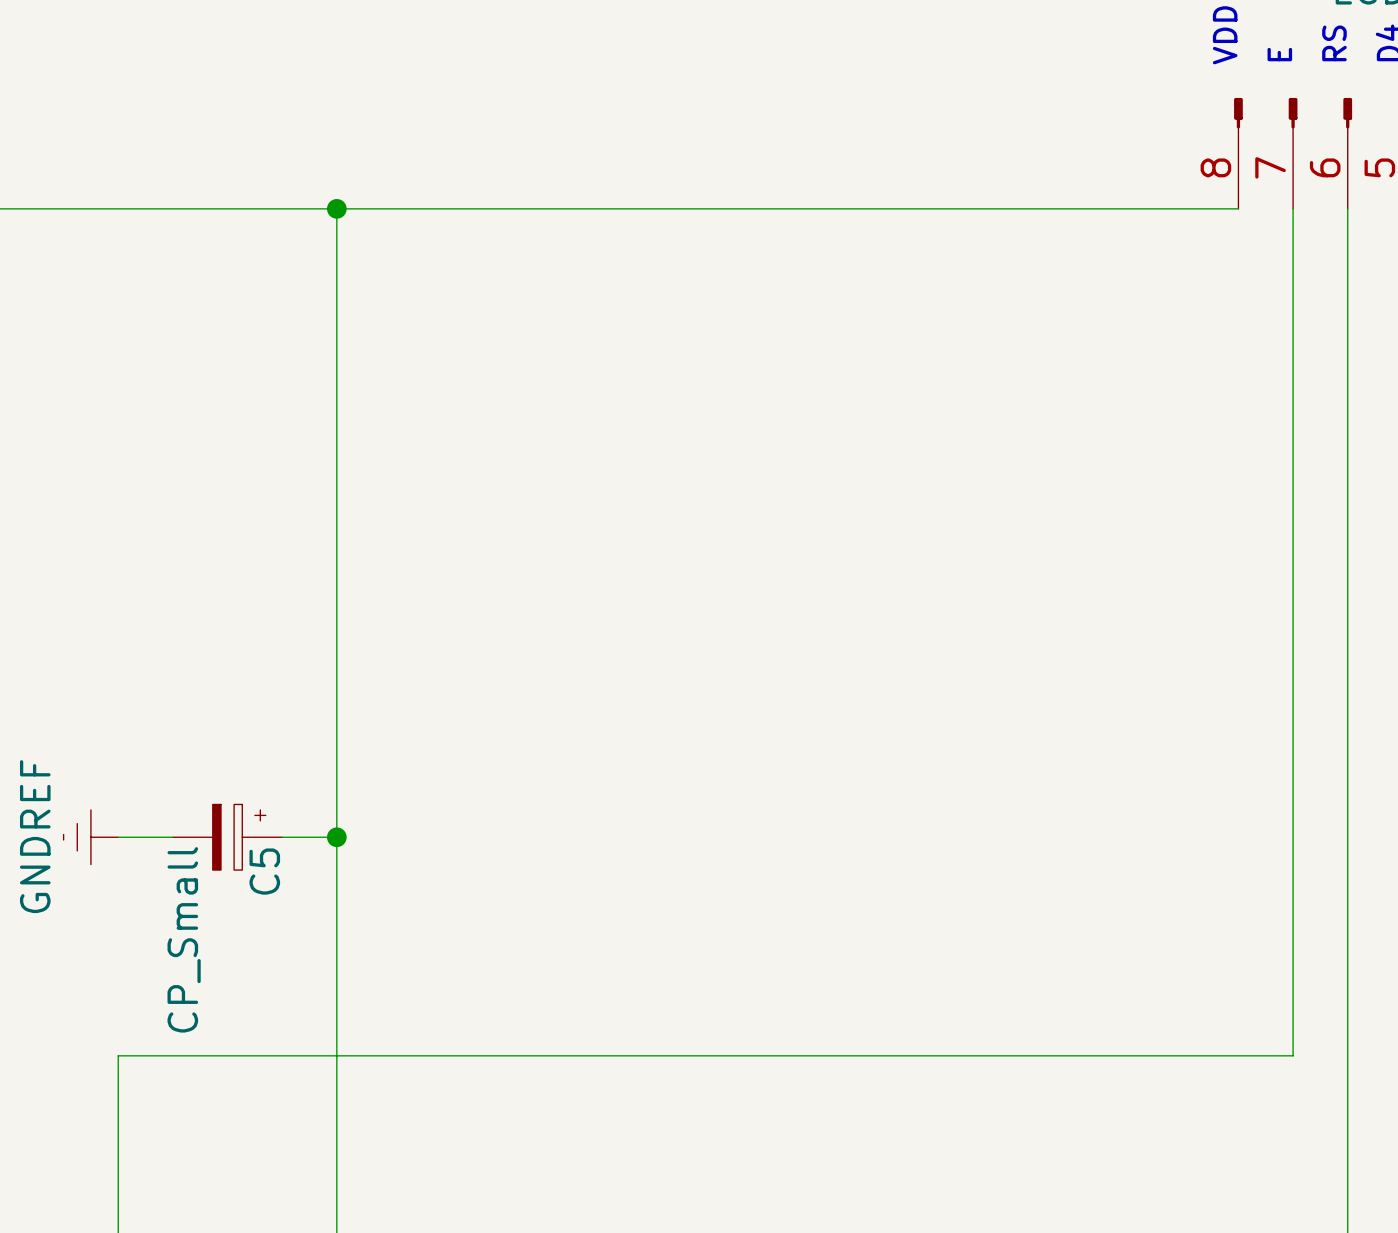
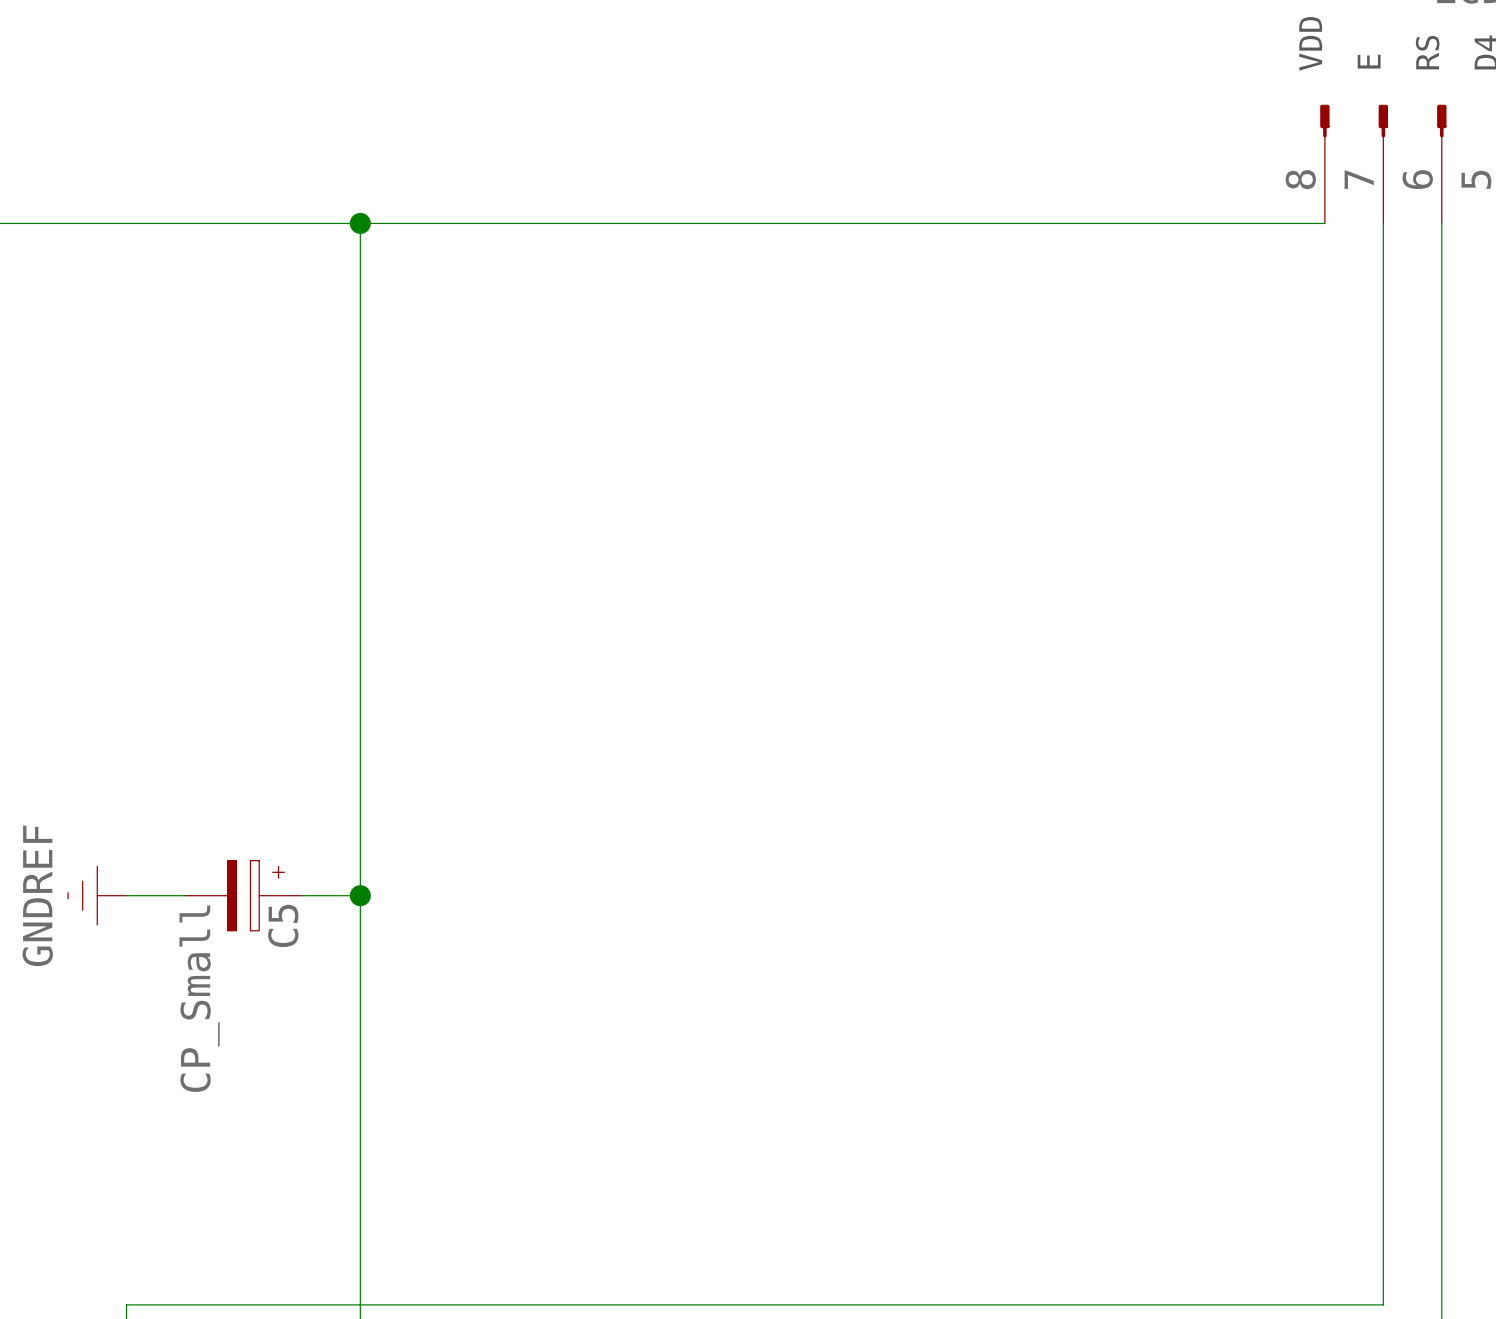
wire: (1293, 1055) (118, 1055) (118, 1219) -> (1383, 1129) (1383, 1304) (126, 1304)

